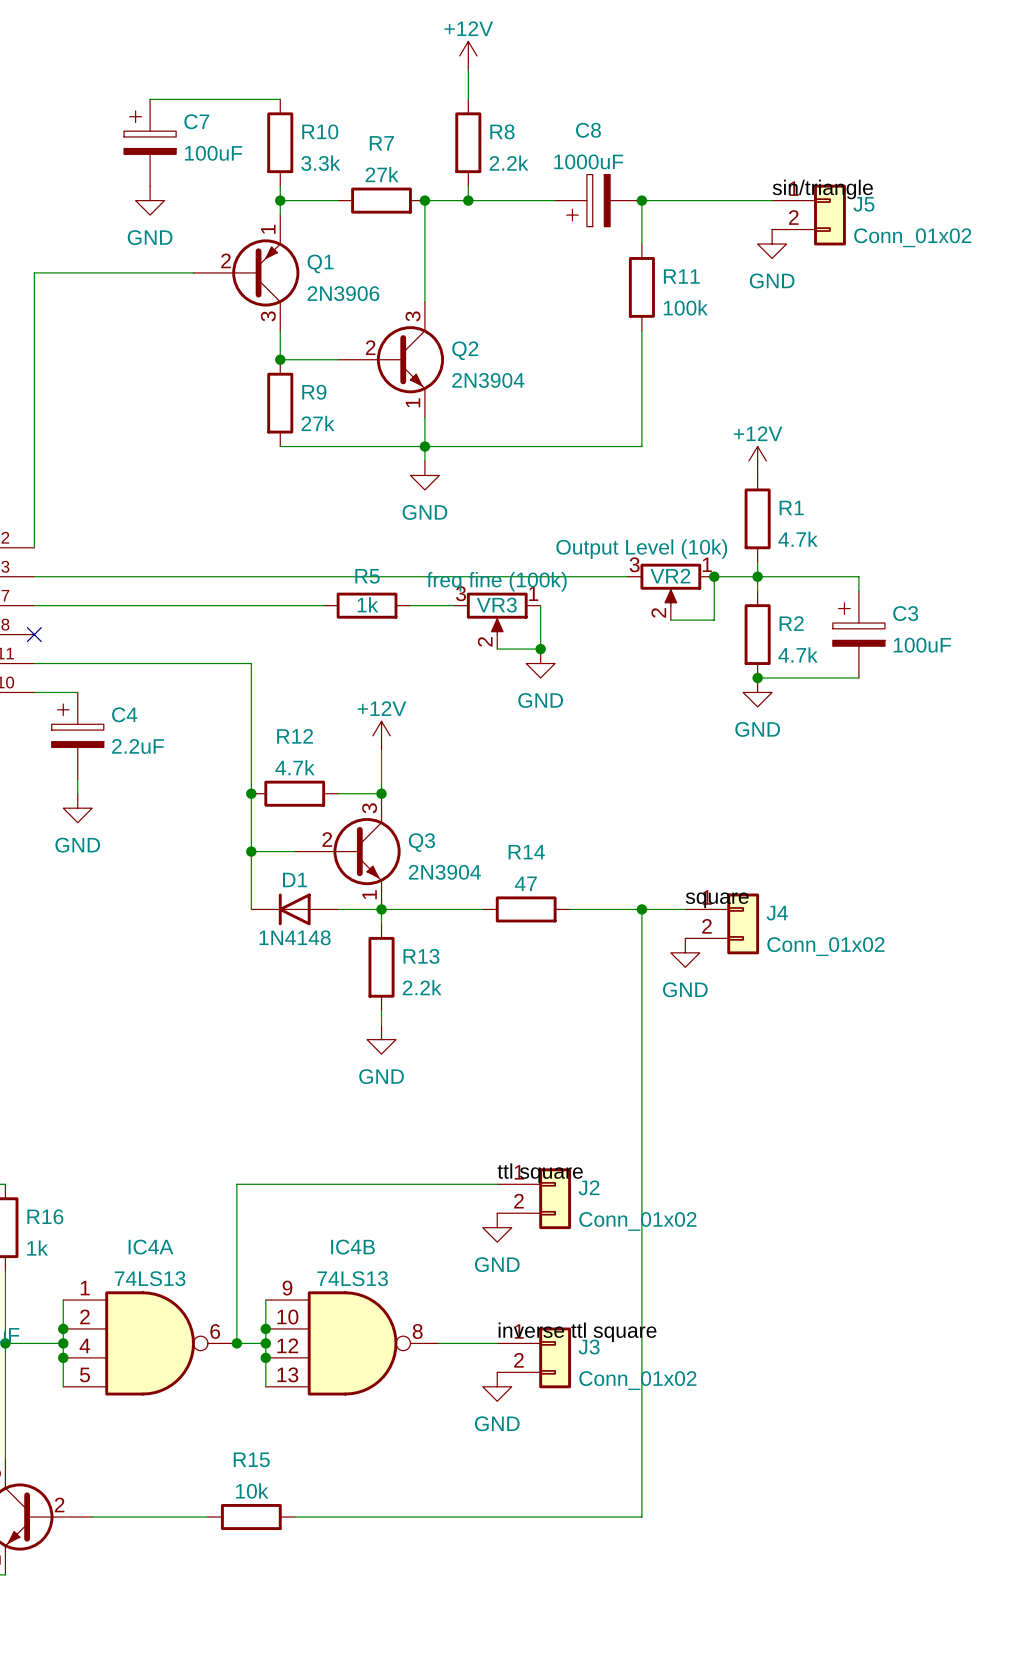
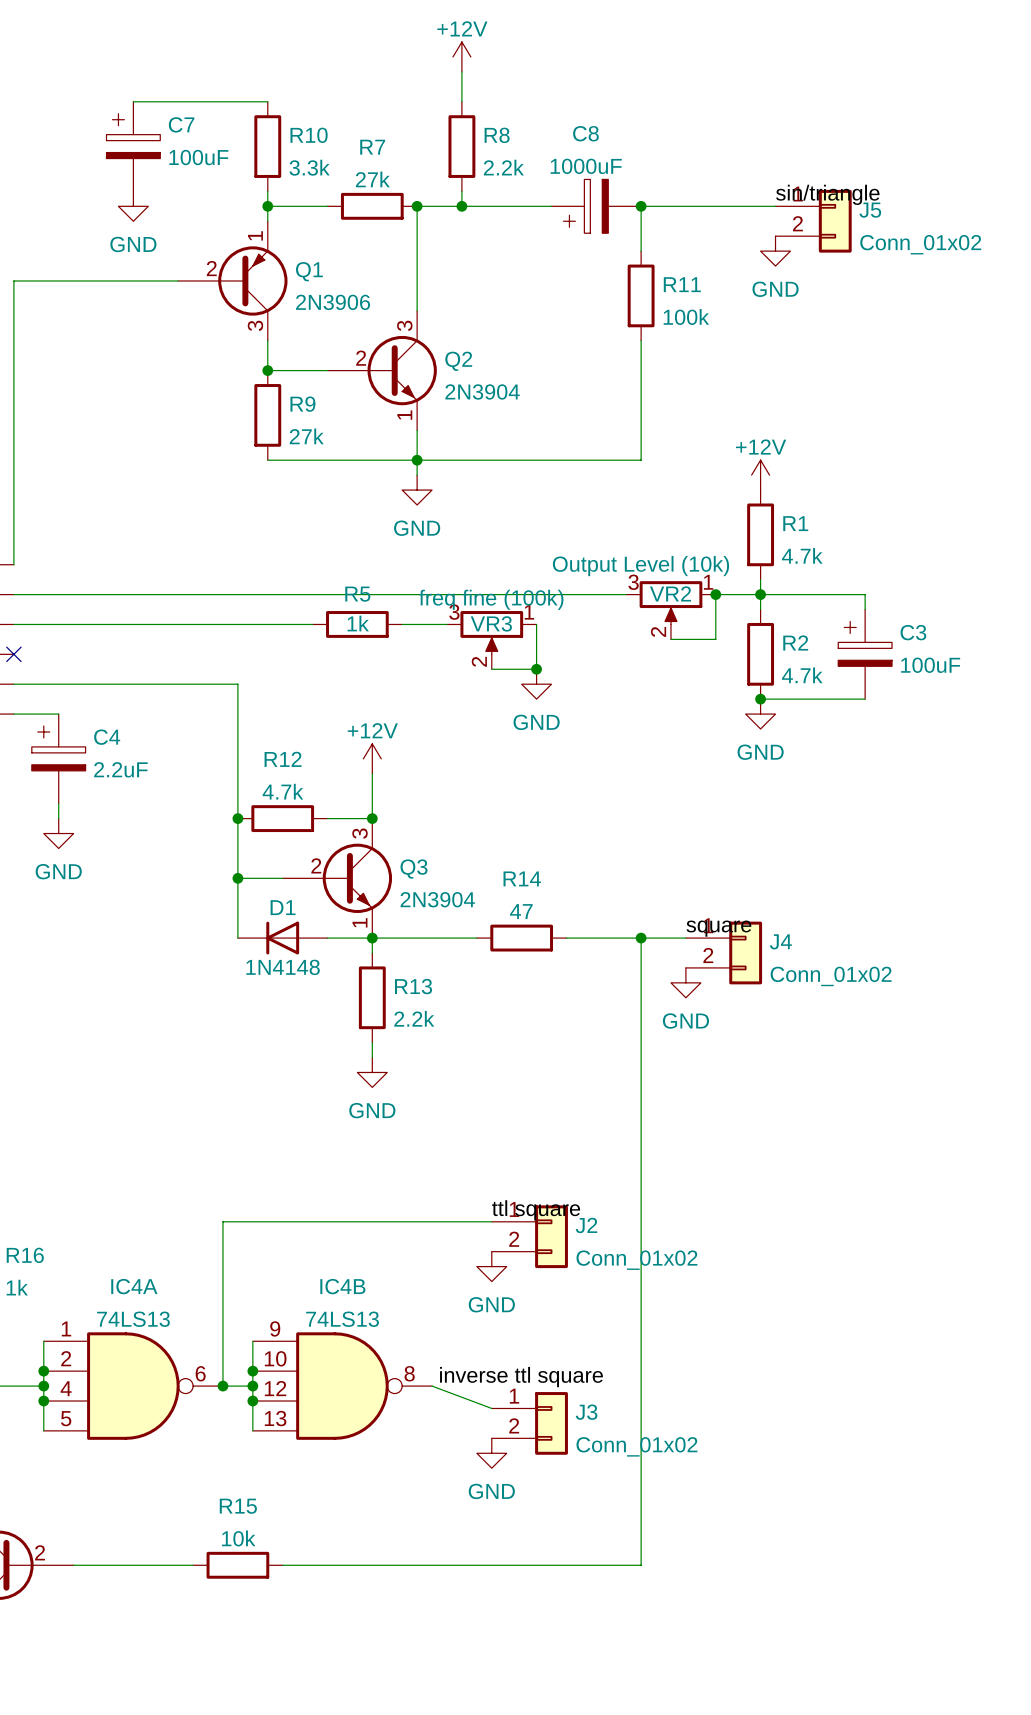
label position: inverse ttl square (577, 1332) -> inverse ttl square (521, 1377)
wire: (439, 1343) (497, 1343) -> (432, 1386) (491, 1408)
J3 position: (534, 1357) -> (529, 1423)
power symbol position: GND (497, 1386) -> GND (491, 1453)

